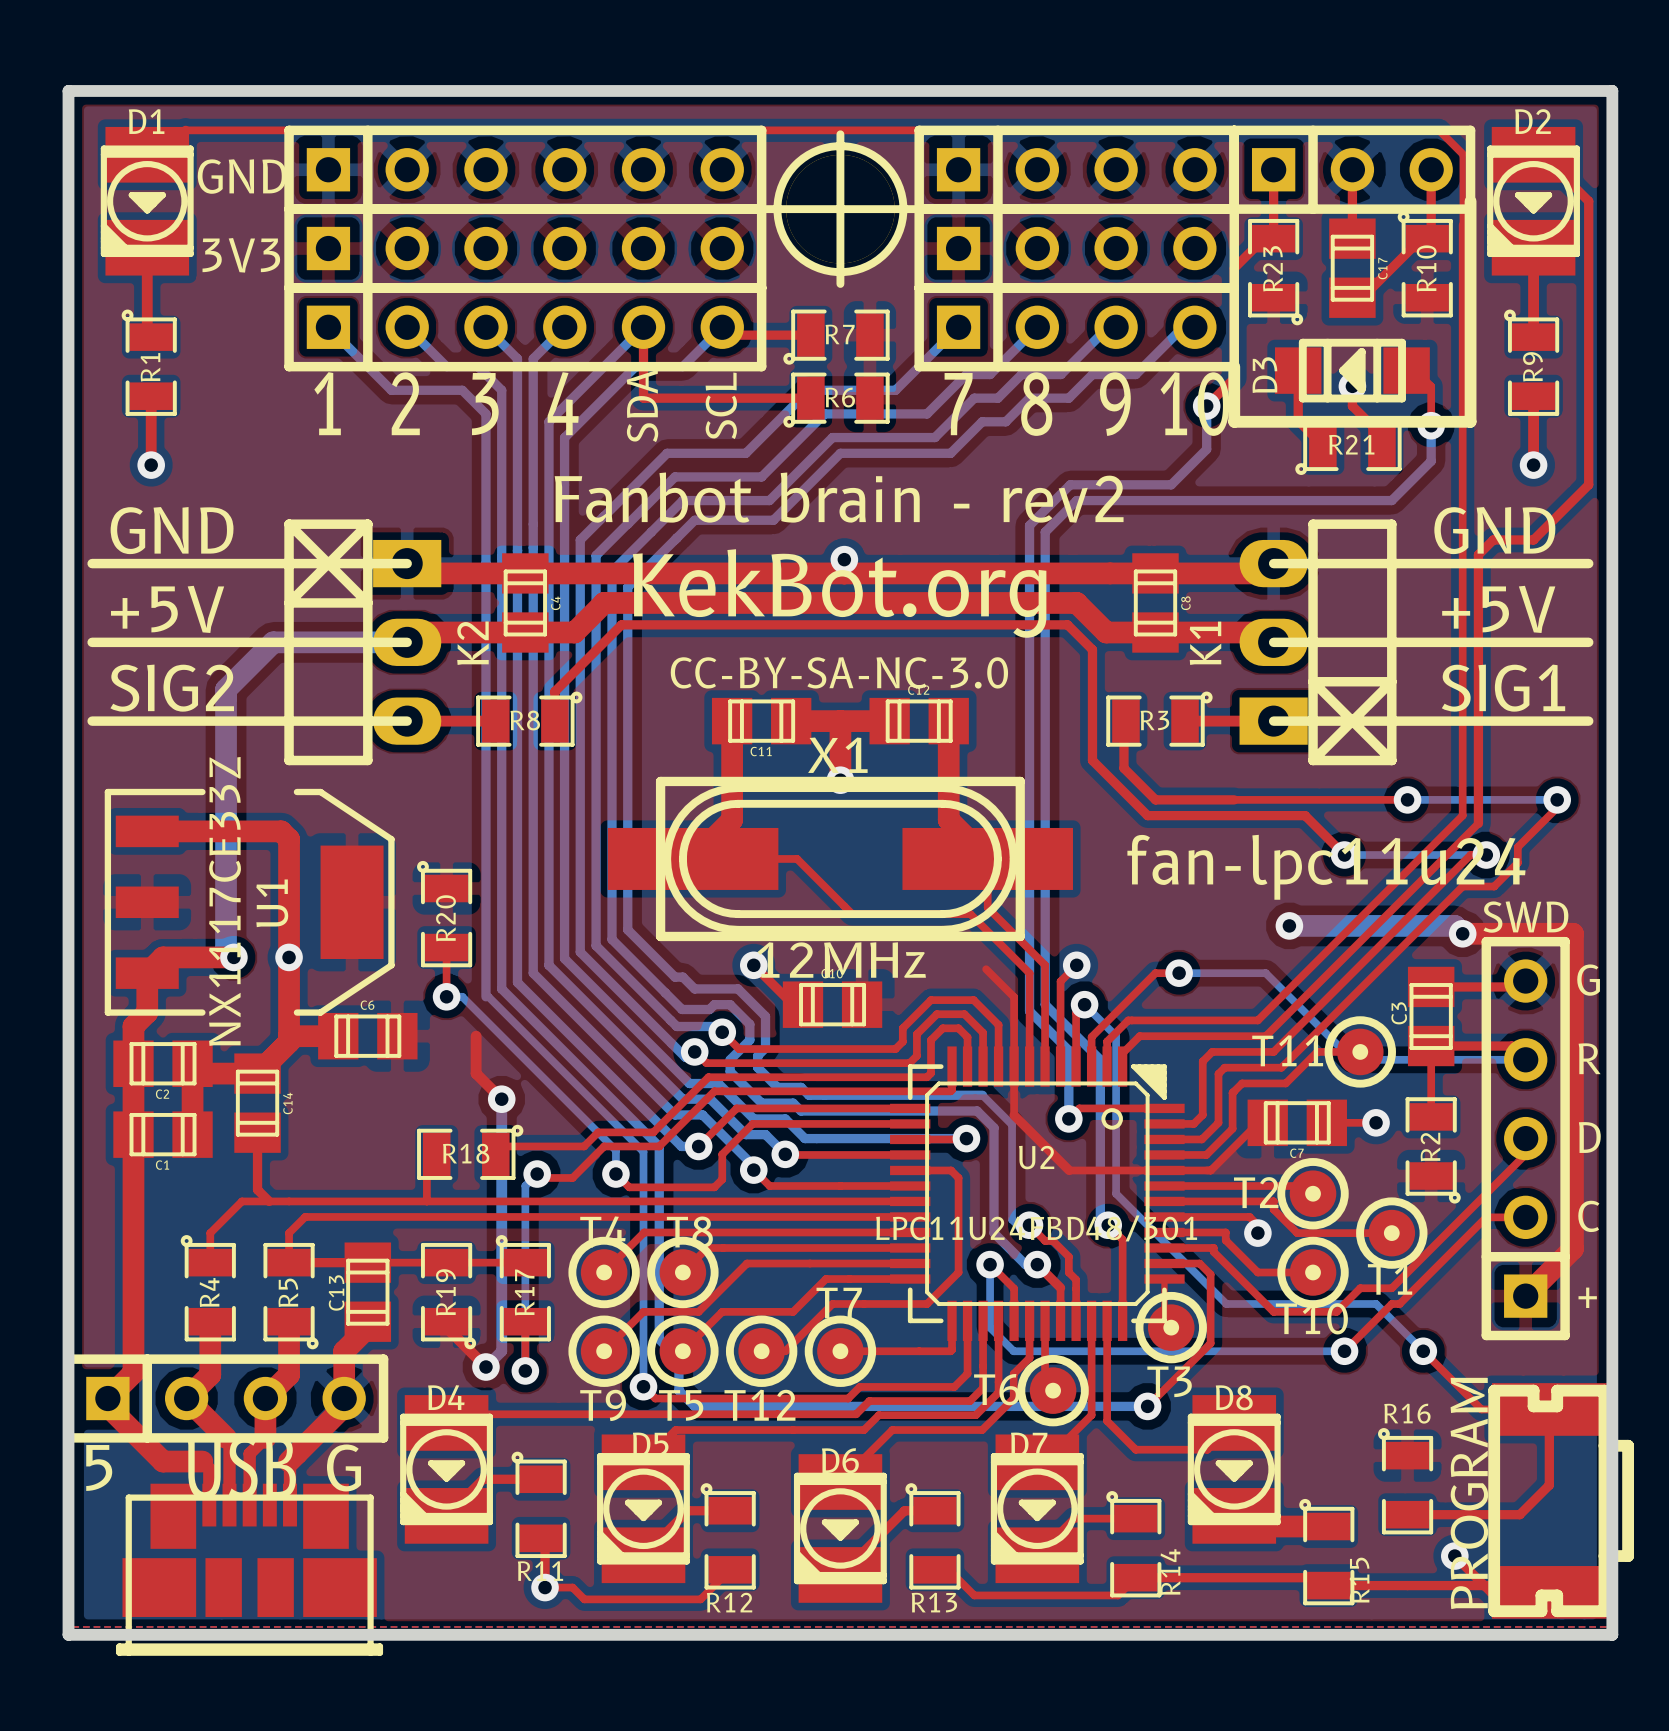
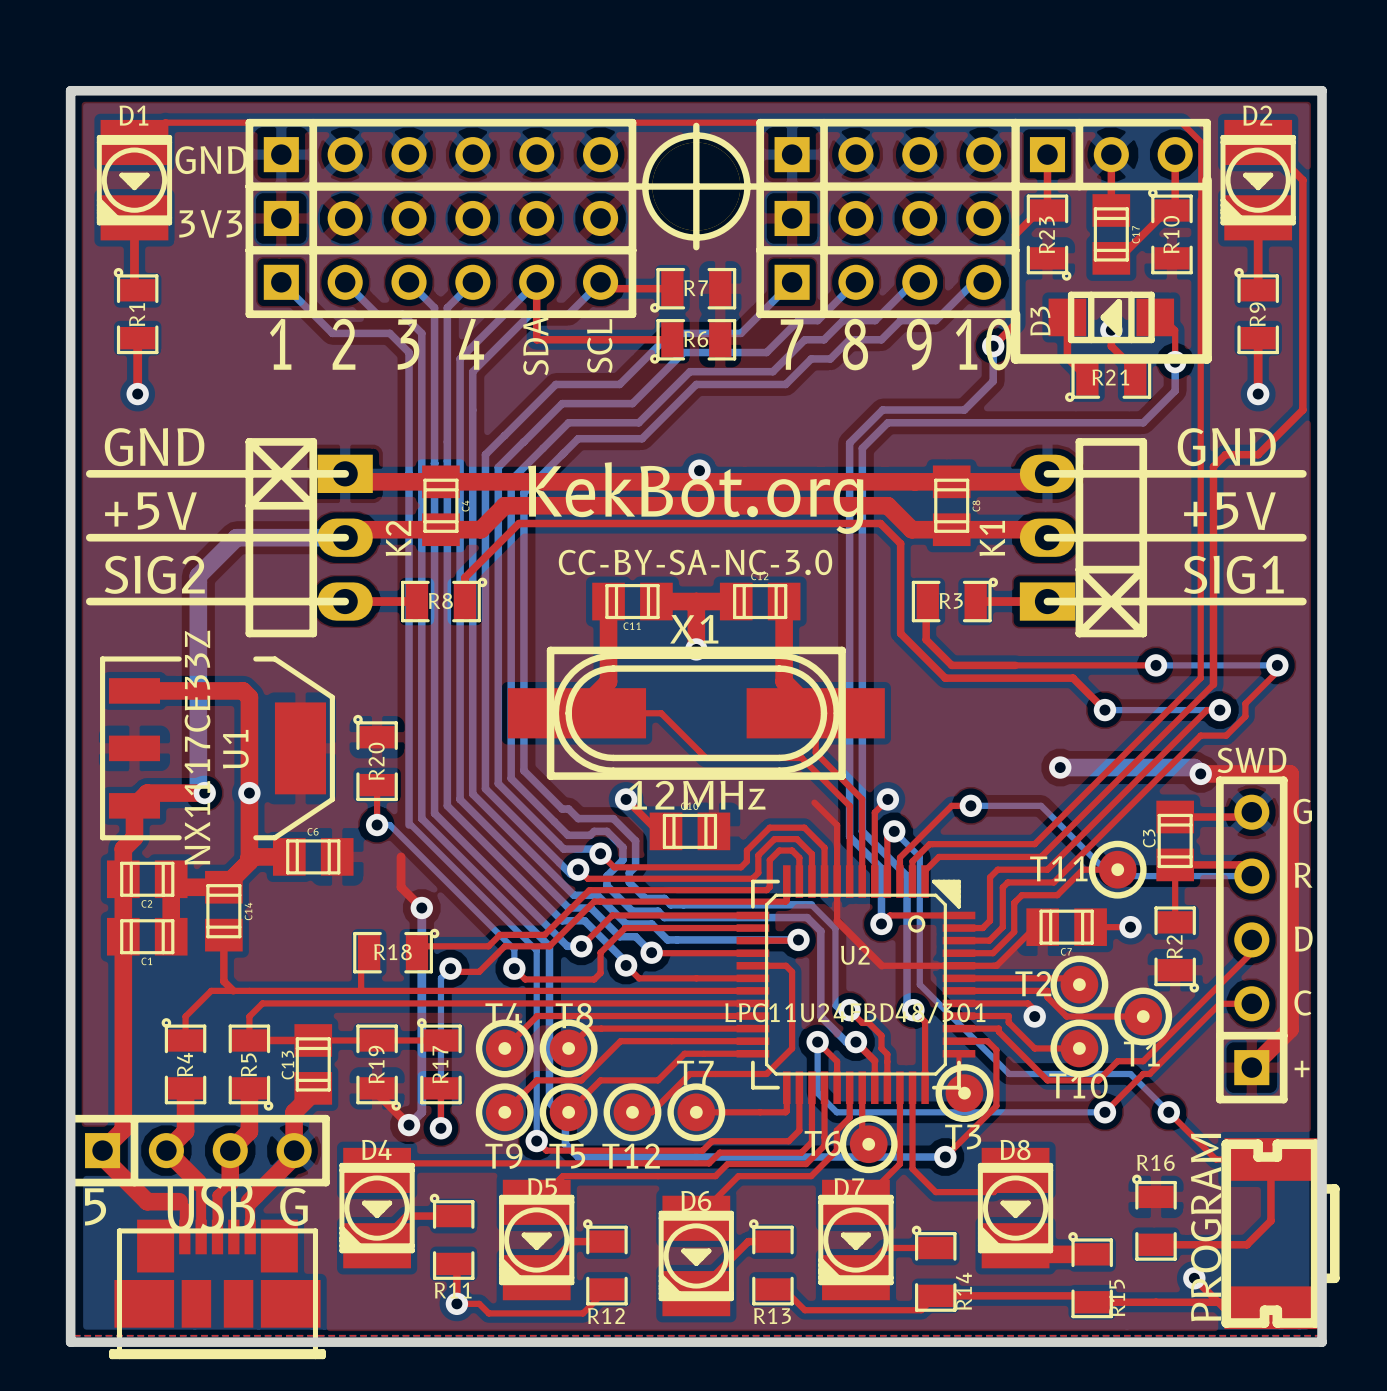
text: Fanbot brain - rev2 (839, 497) -> none
text: fan-lpc11u24 (1326, 867) -> none

